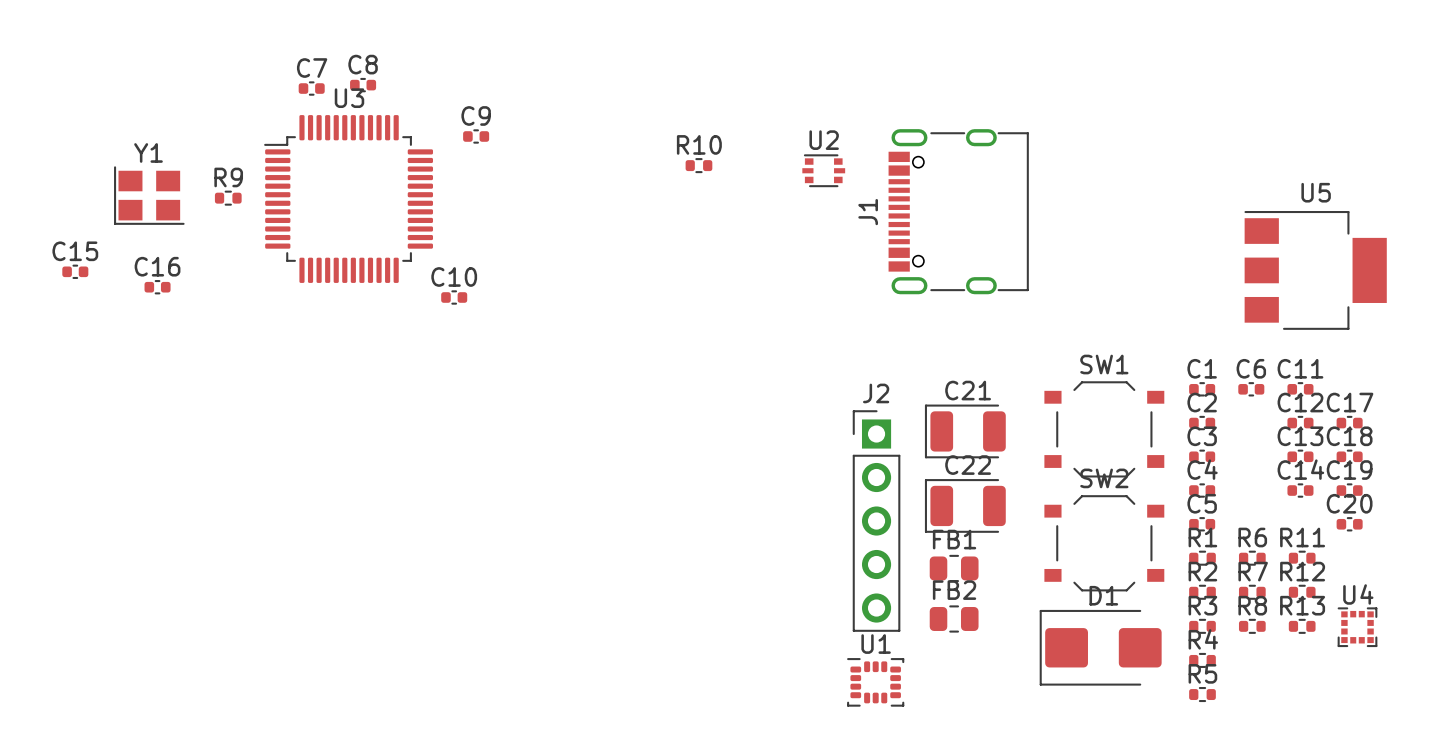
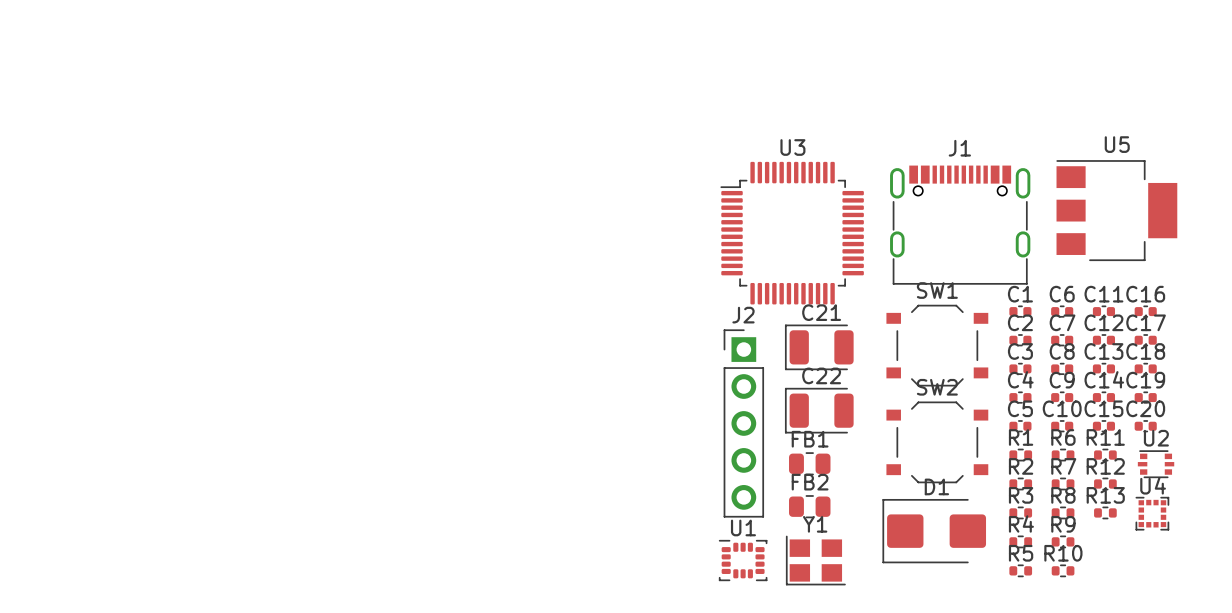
C8 position: (363, 85) -> (1062, 368)
C7 position: (311, 88) -> (1062, 340)
C9 position: (476, 136) -> (1062, 397)
R10 position: (698, 165) -> (1063, 570)
U2 position: (823, 170) -> (1156, 464)
Y1 position: (149, 195) -> (815, 560)
R9 position: (228, 198) -> (1063, 541)
U3 position: (348, 199) -> (792, 233)
J1 rotation: 0° (958, 211) -> 90° clockwise (960, 225)
J1 position: (958, 211) -> (960, 225)
C15 position: (75, 271) -> (1103, 426)
C16 position: (157, 287) -> (1145, 311)
C10 position: (454, 297) -> (1062, 426)

